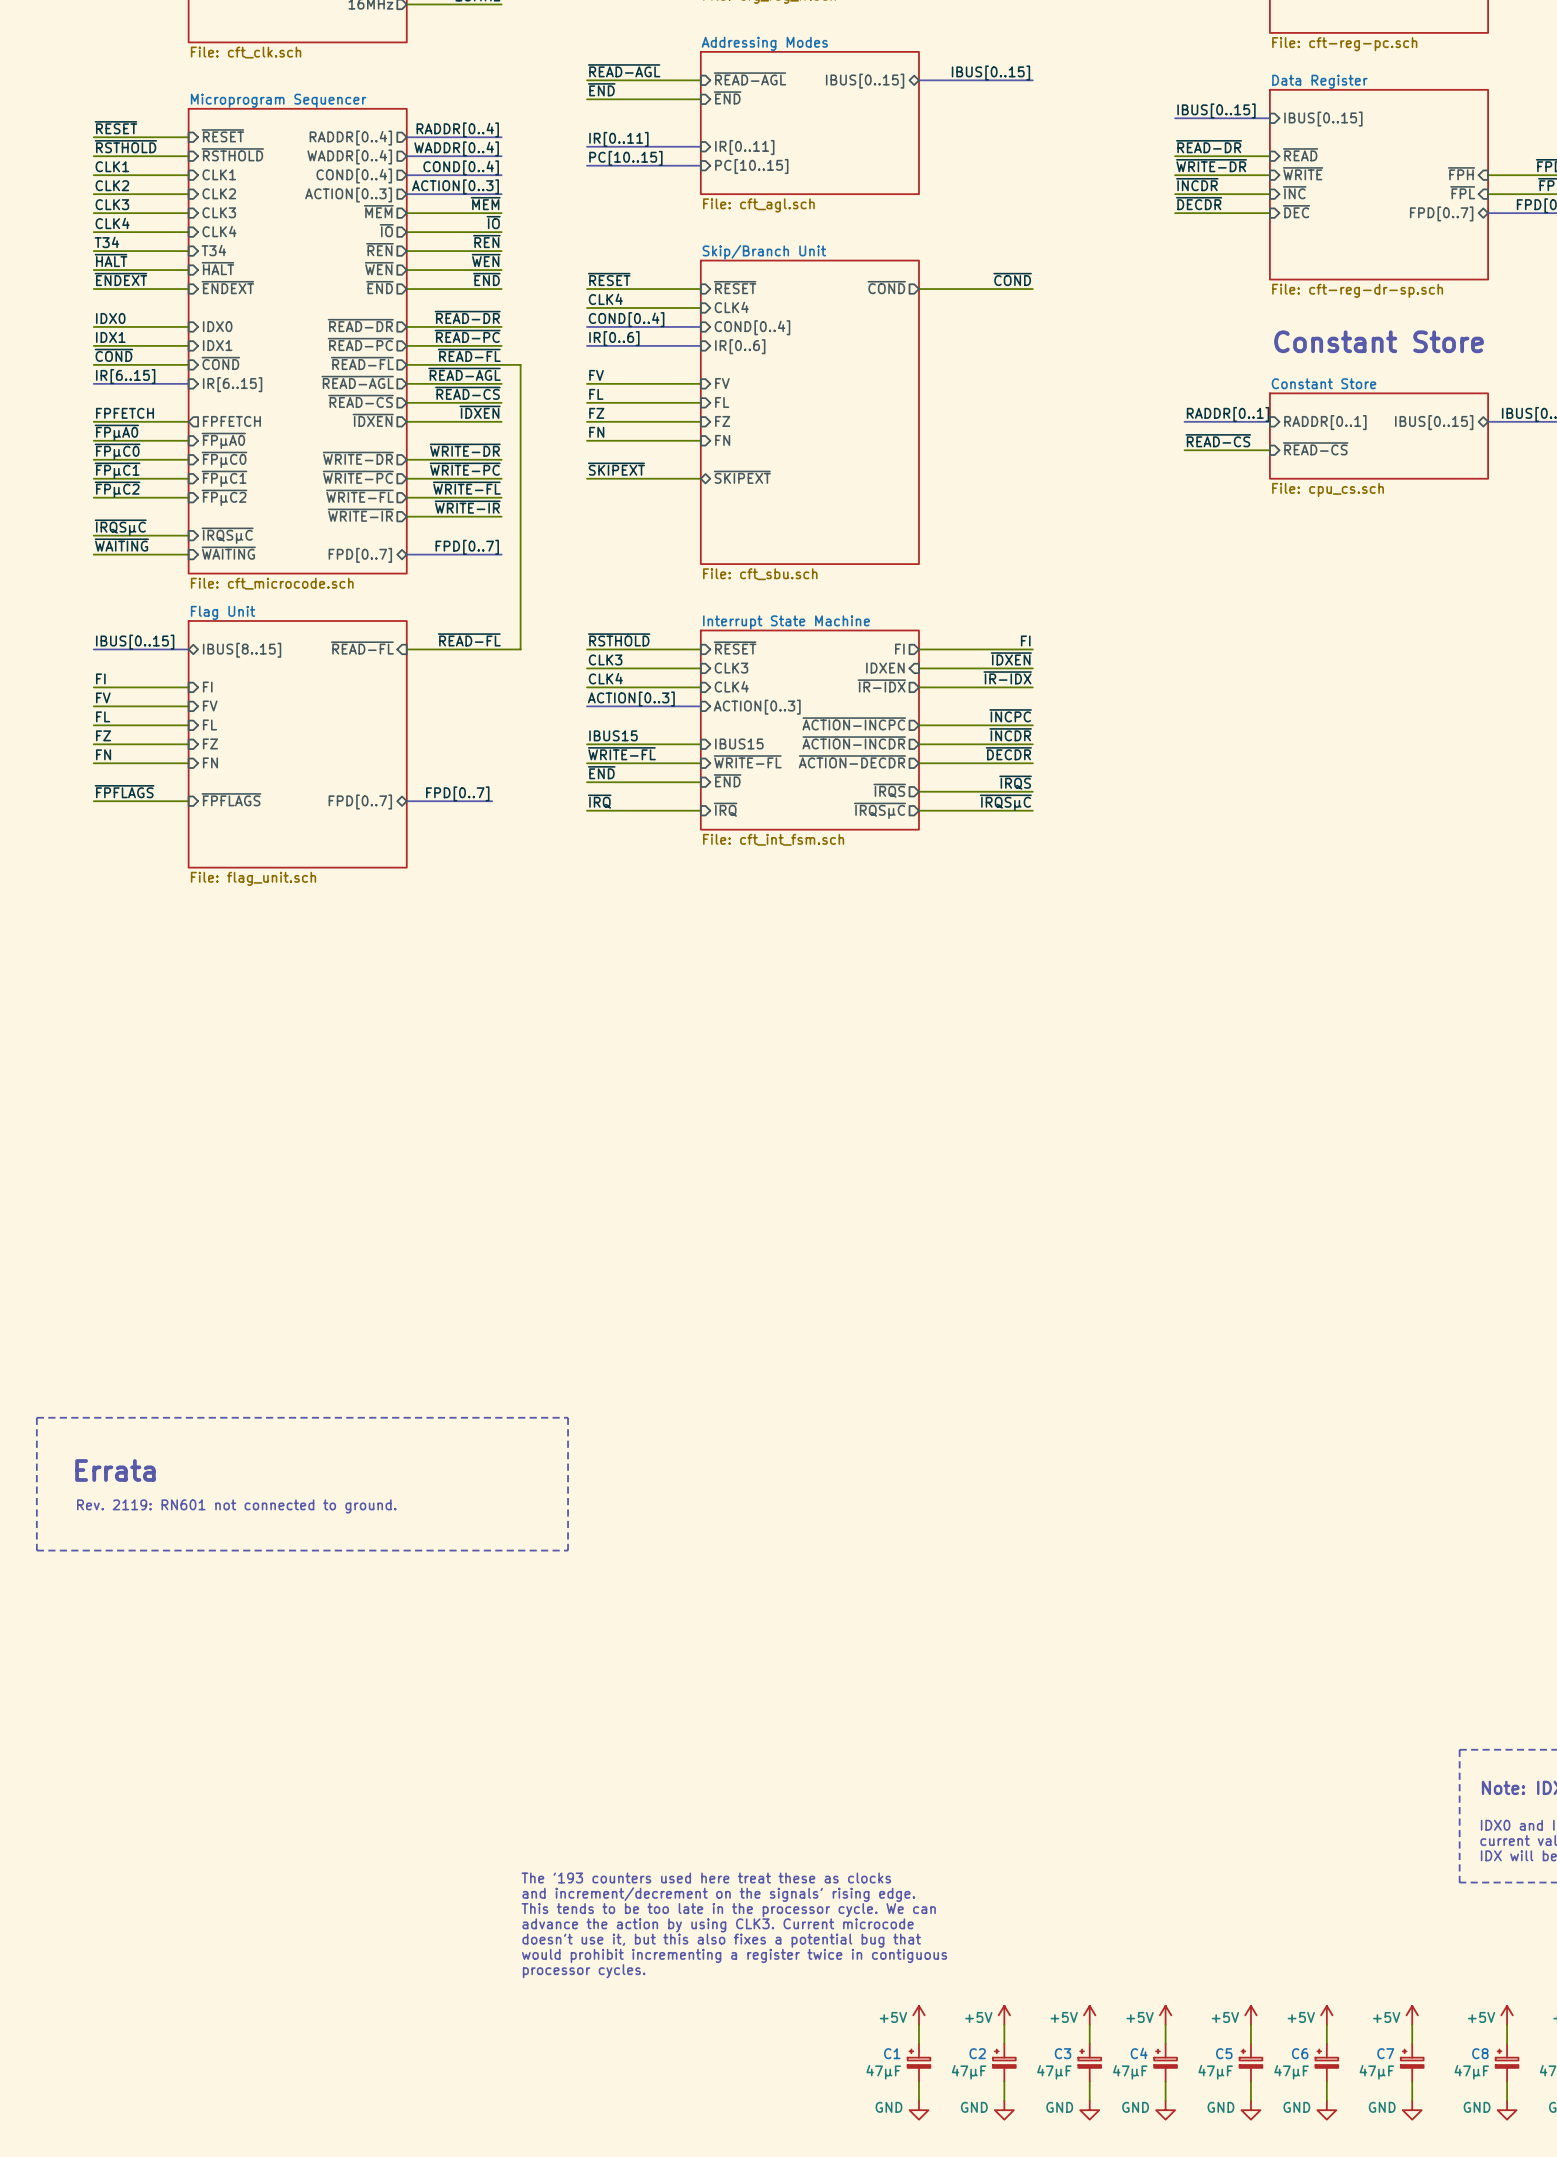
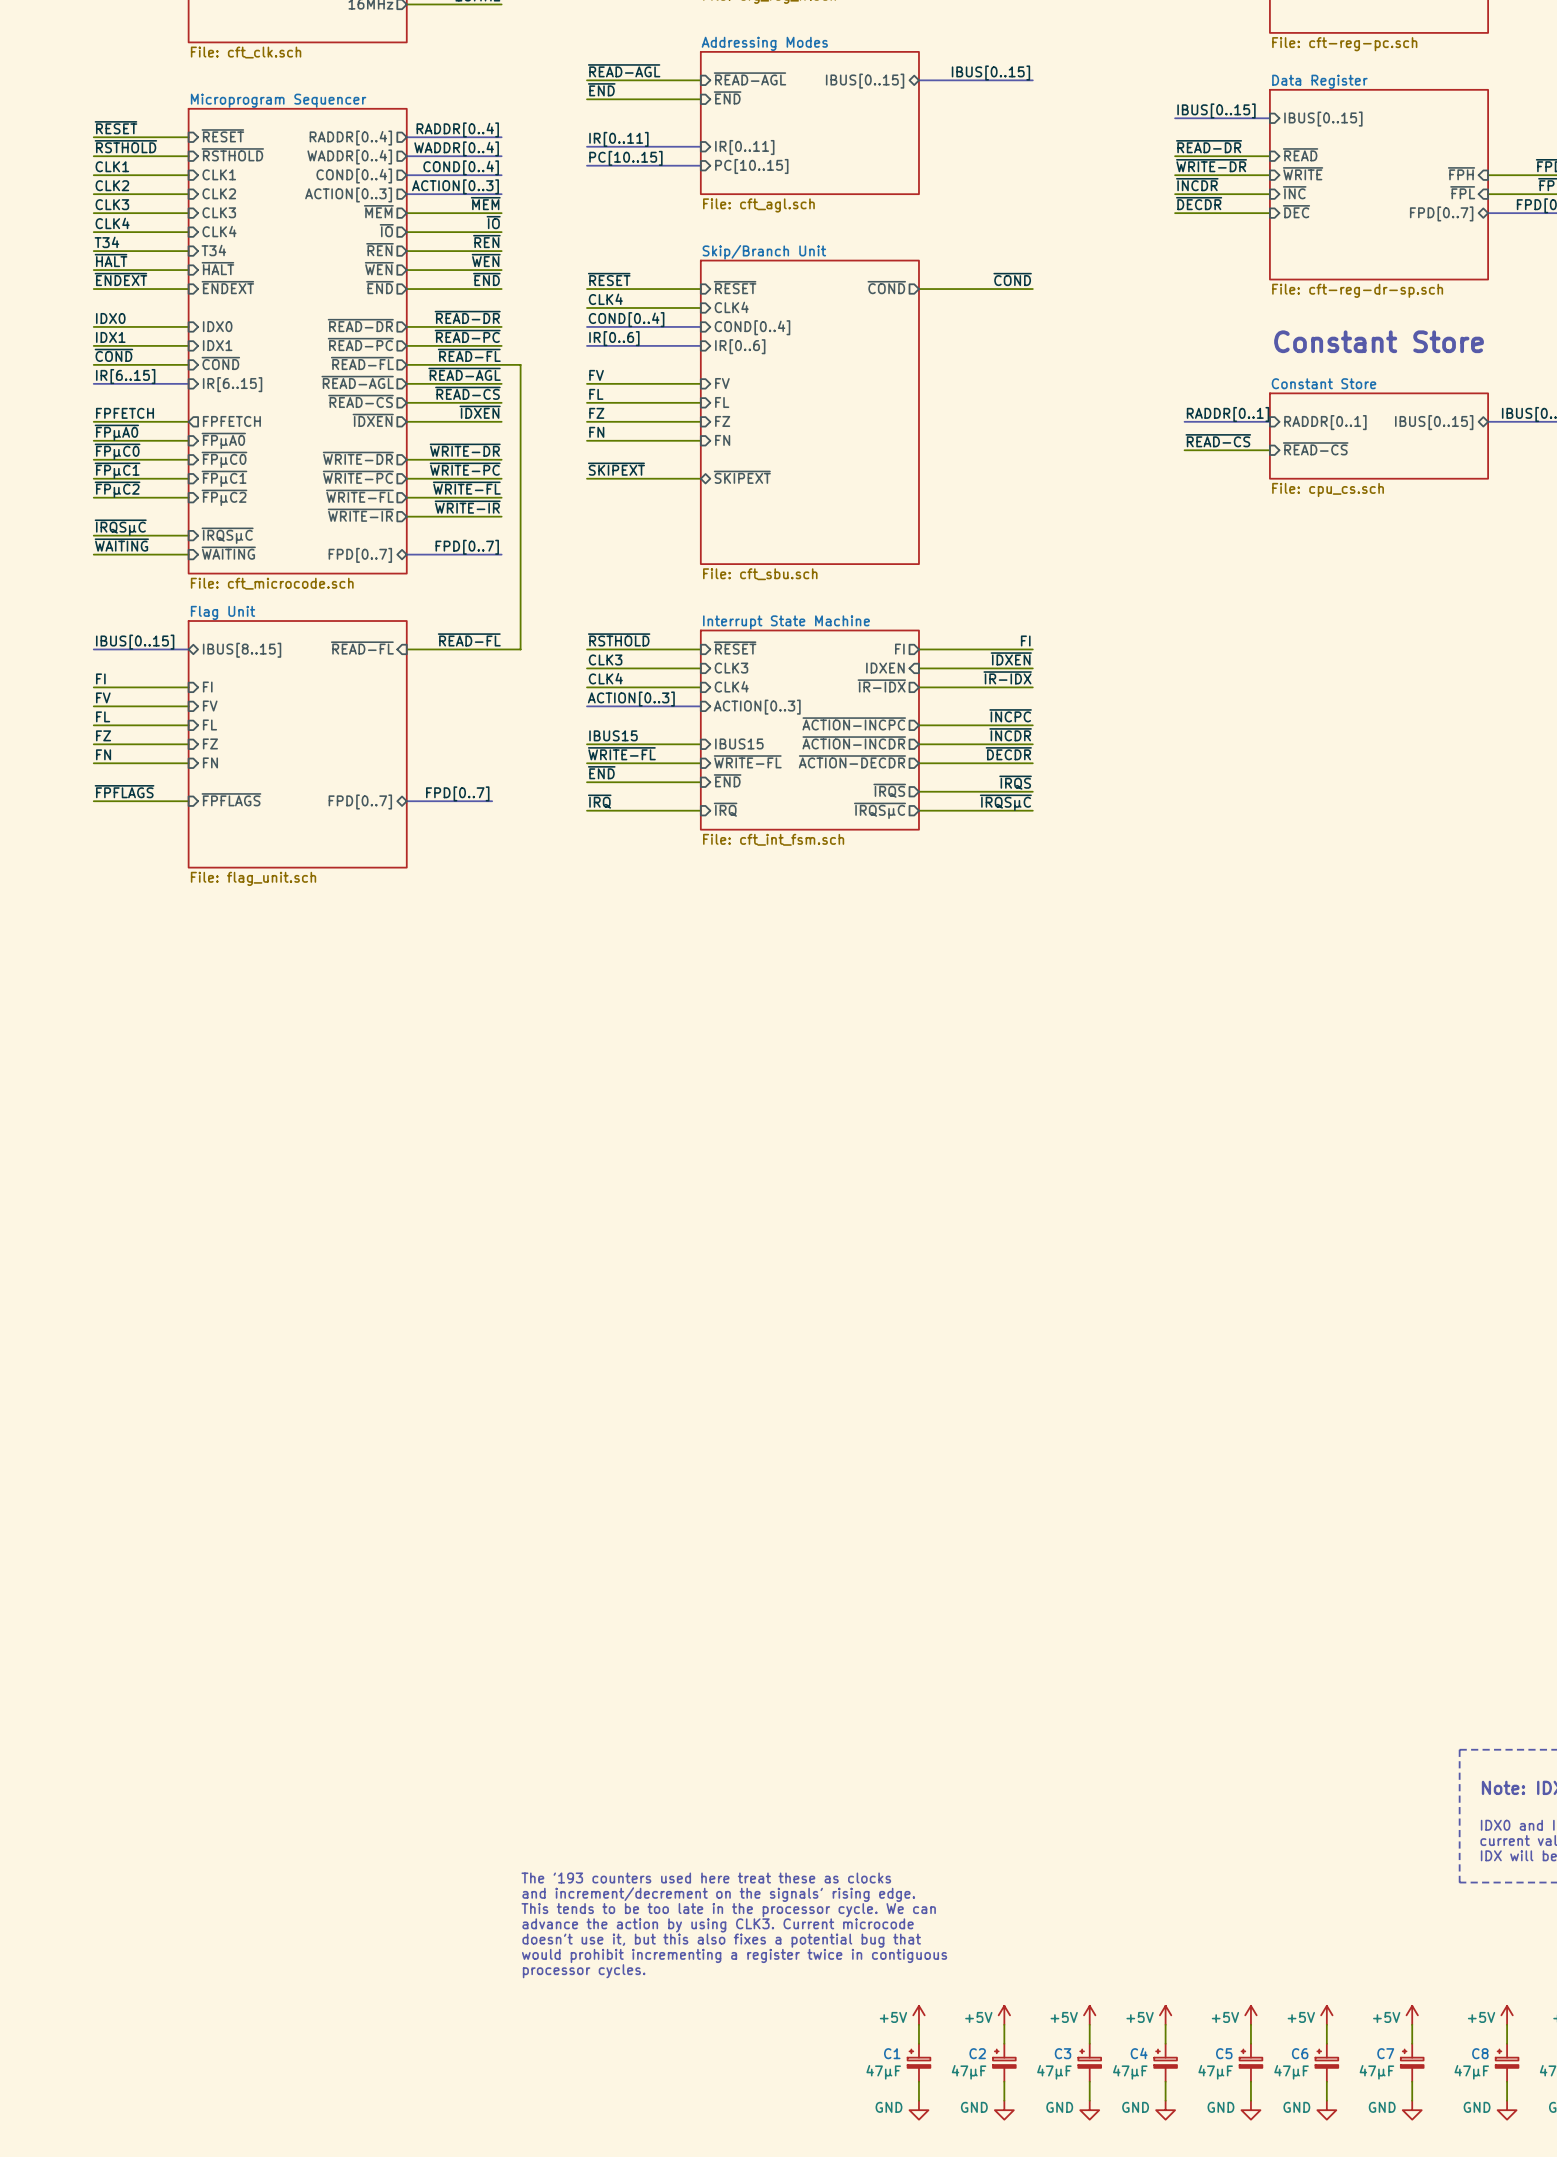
line: (36, 1417) (568, 1417) (568, 1550) (36, 1550) (36, 1417) -> none
text: Errata (115, 1470) -> none
text: Rev. 2119: RN601 not connected to ground. (236, 1506) -> none

